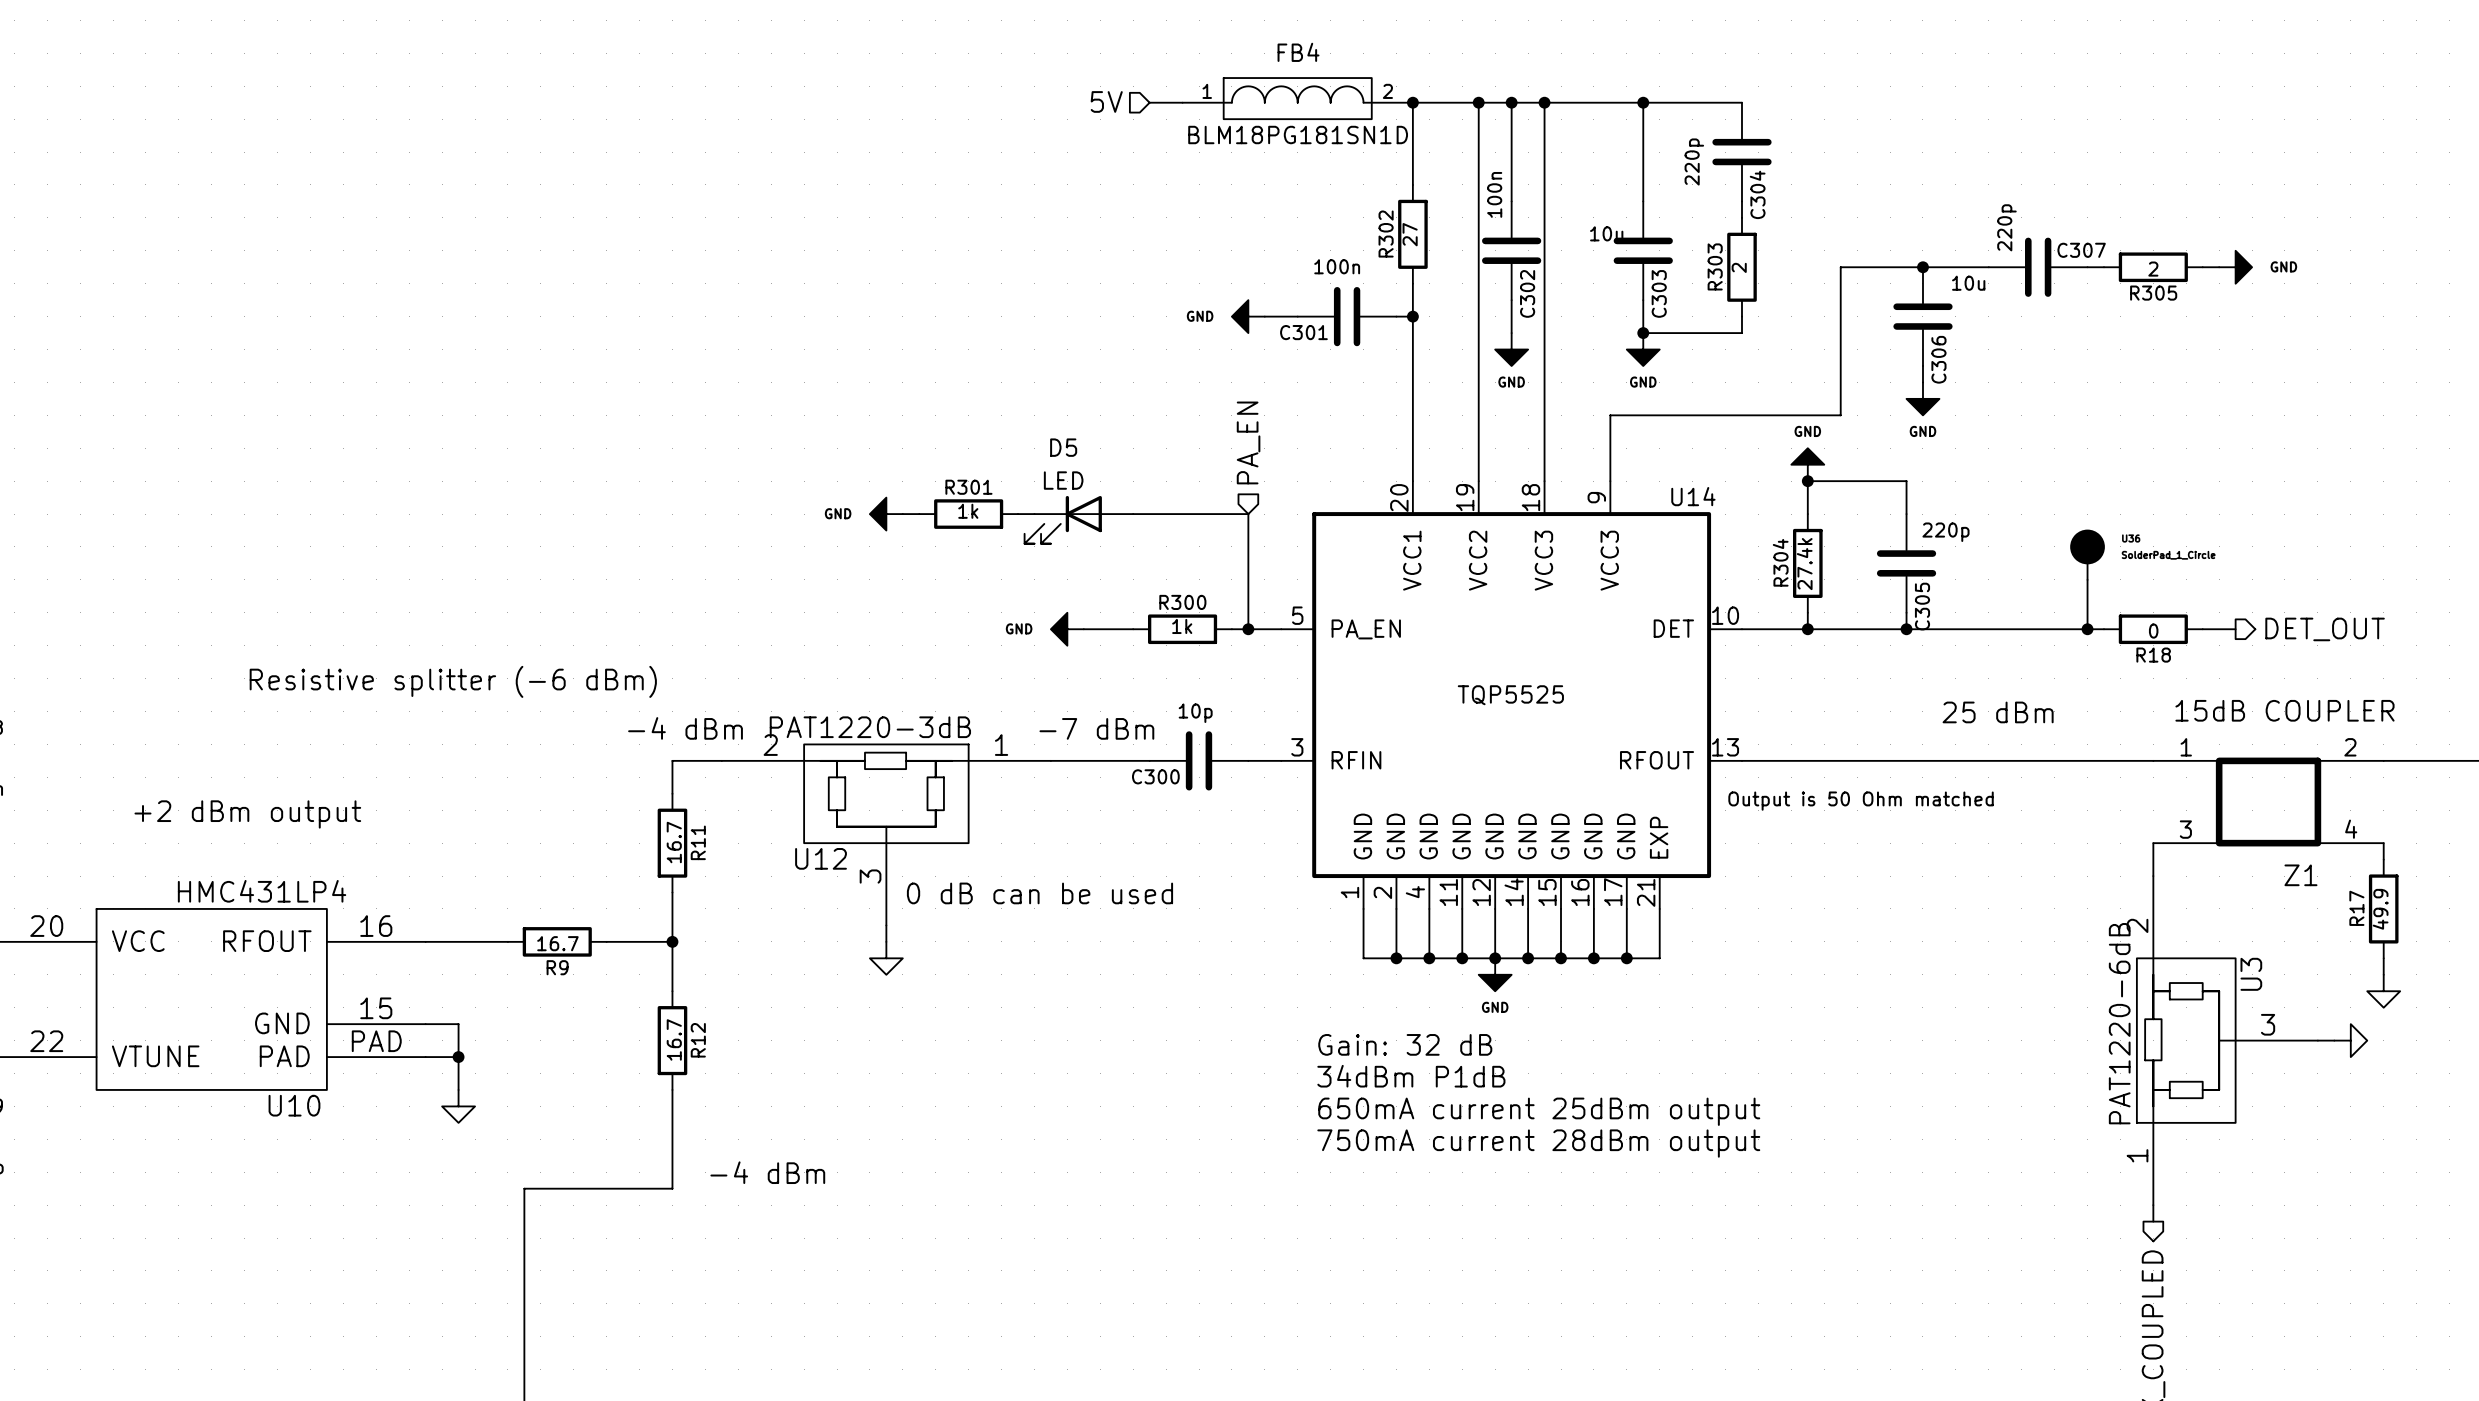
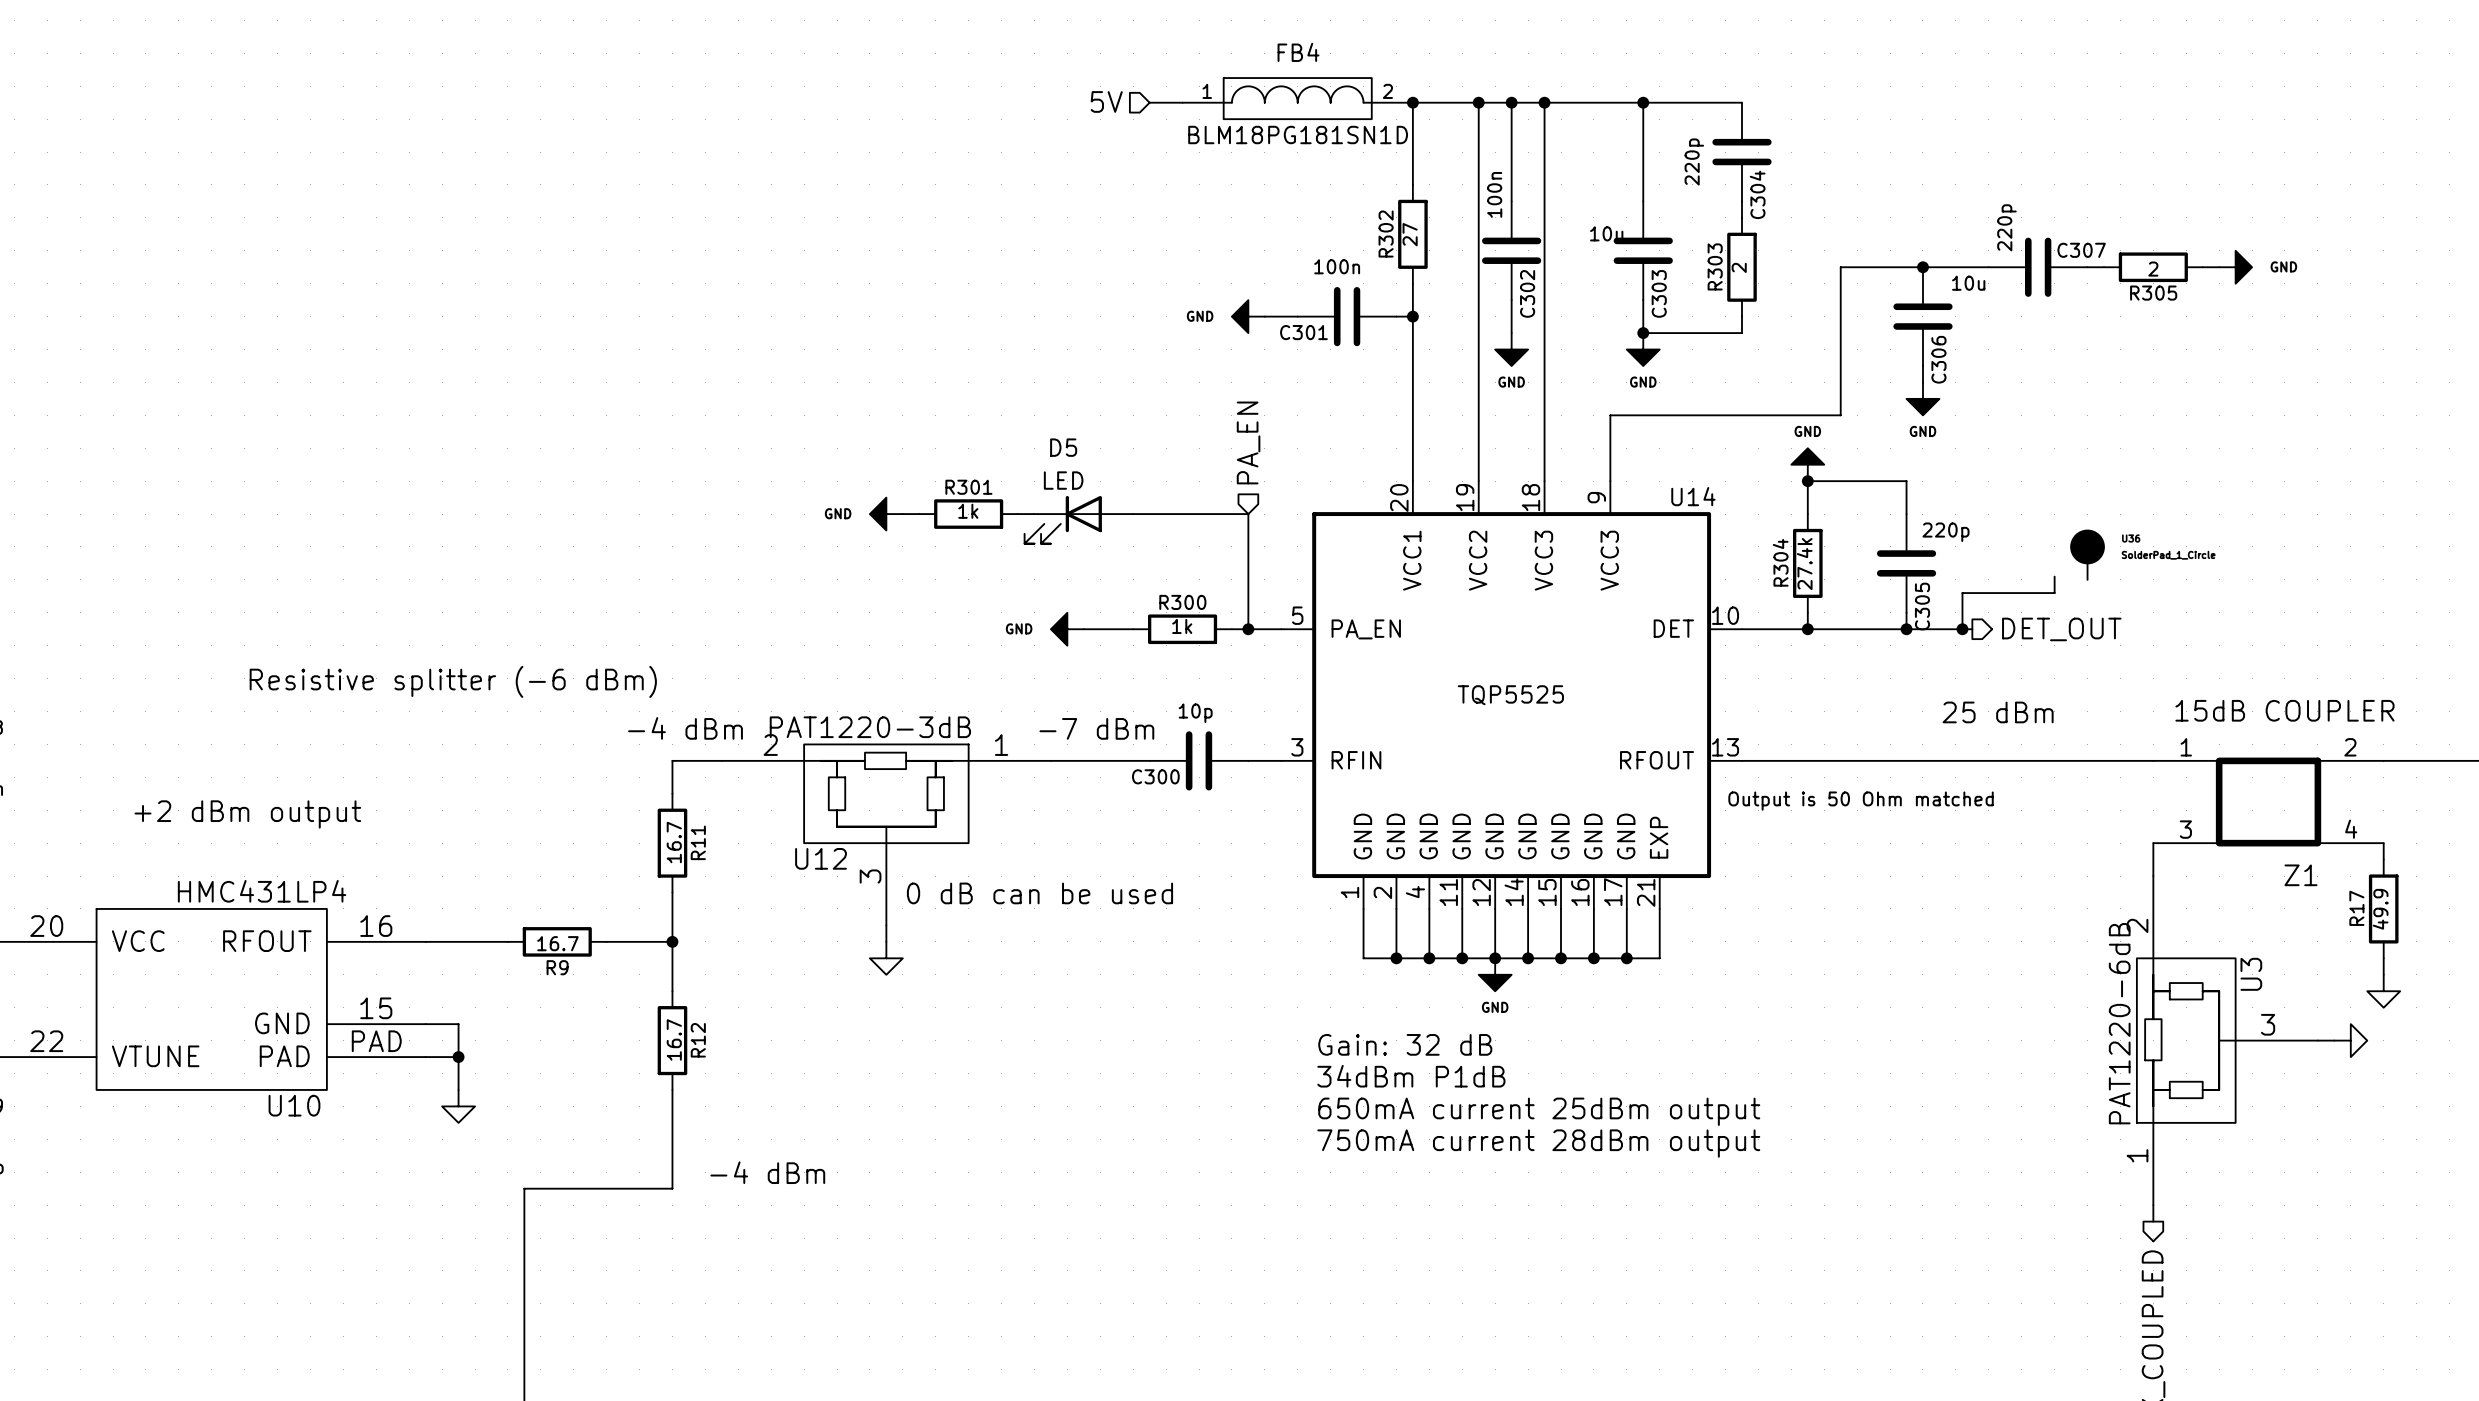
wire: none -> (2054, 576) (2054, 593) (1962, 593) (1962, 629)
wire: (2087, 579) (2087, 629) -> none
junction: none -> (1962, 629)
wire: (1972, 629) (2103, 629) -> none
junction: (2087, 629) -> none
R18: 0 (2153, 629) -> none
wire: (2202, 629) (2235, 629) -> none
hierarchical label position: DET_OUT (2325, 629) -> DET_OUT (2061, 629)

